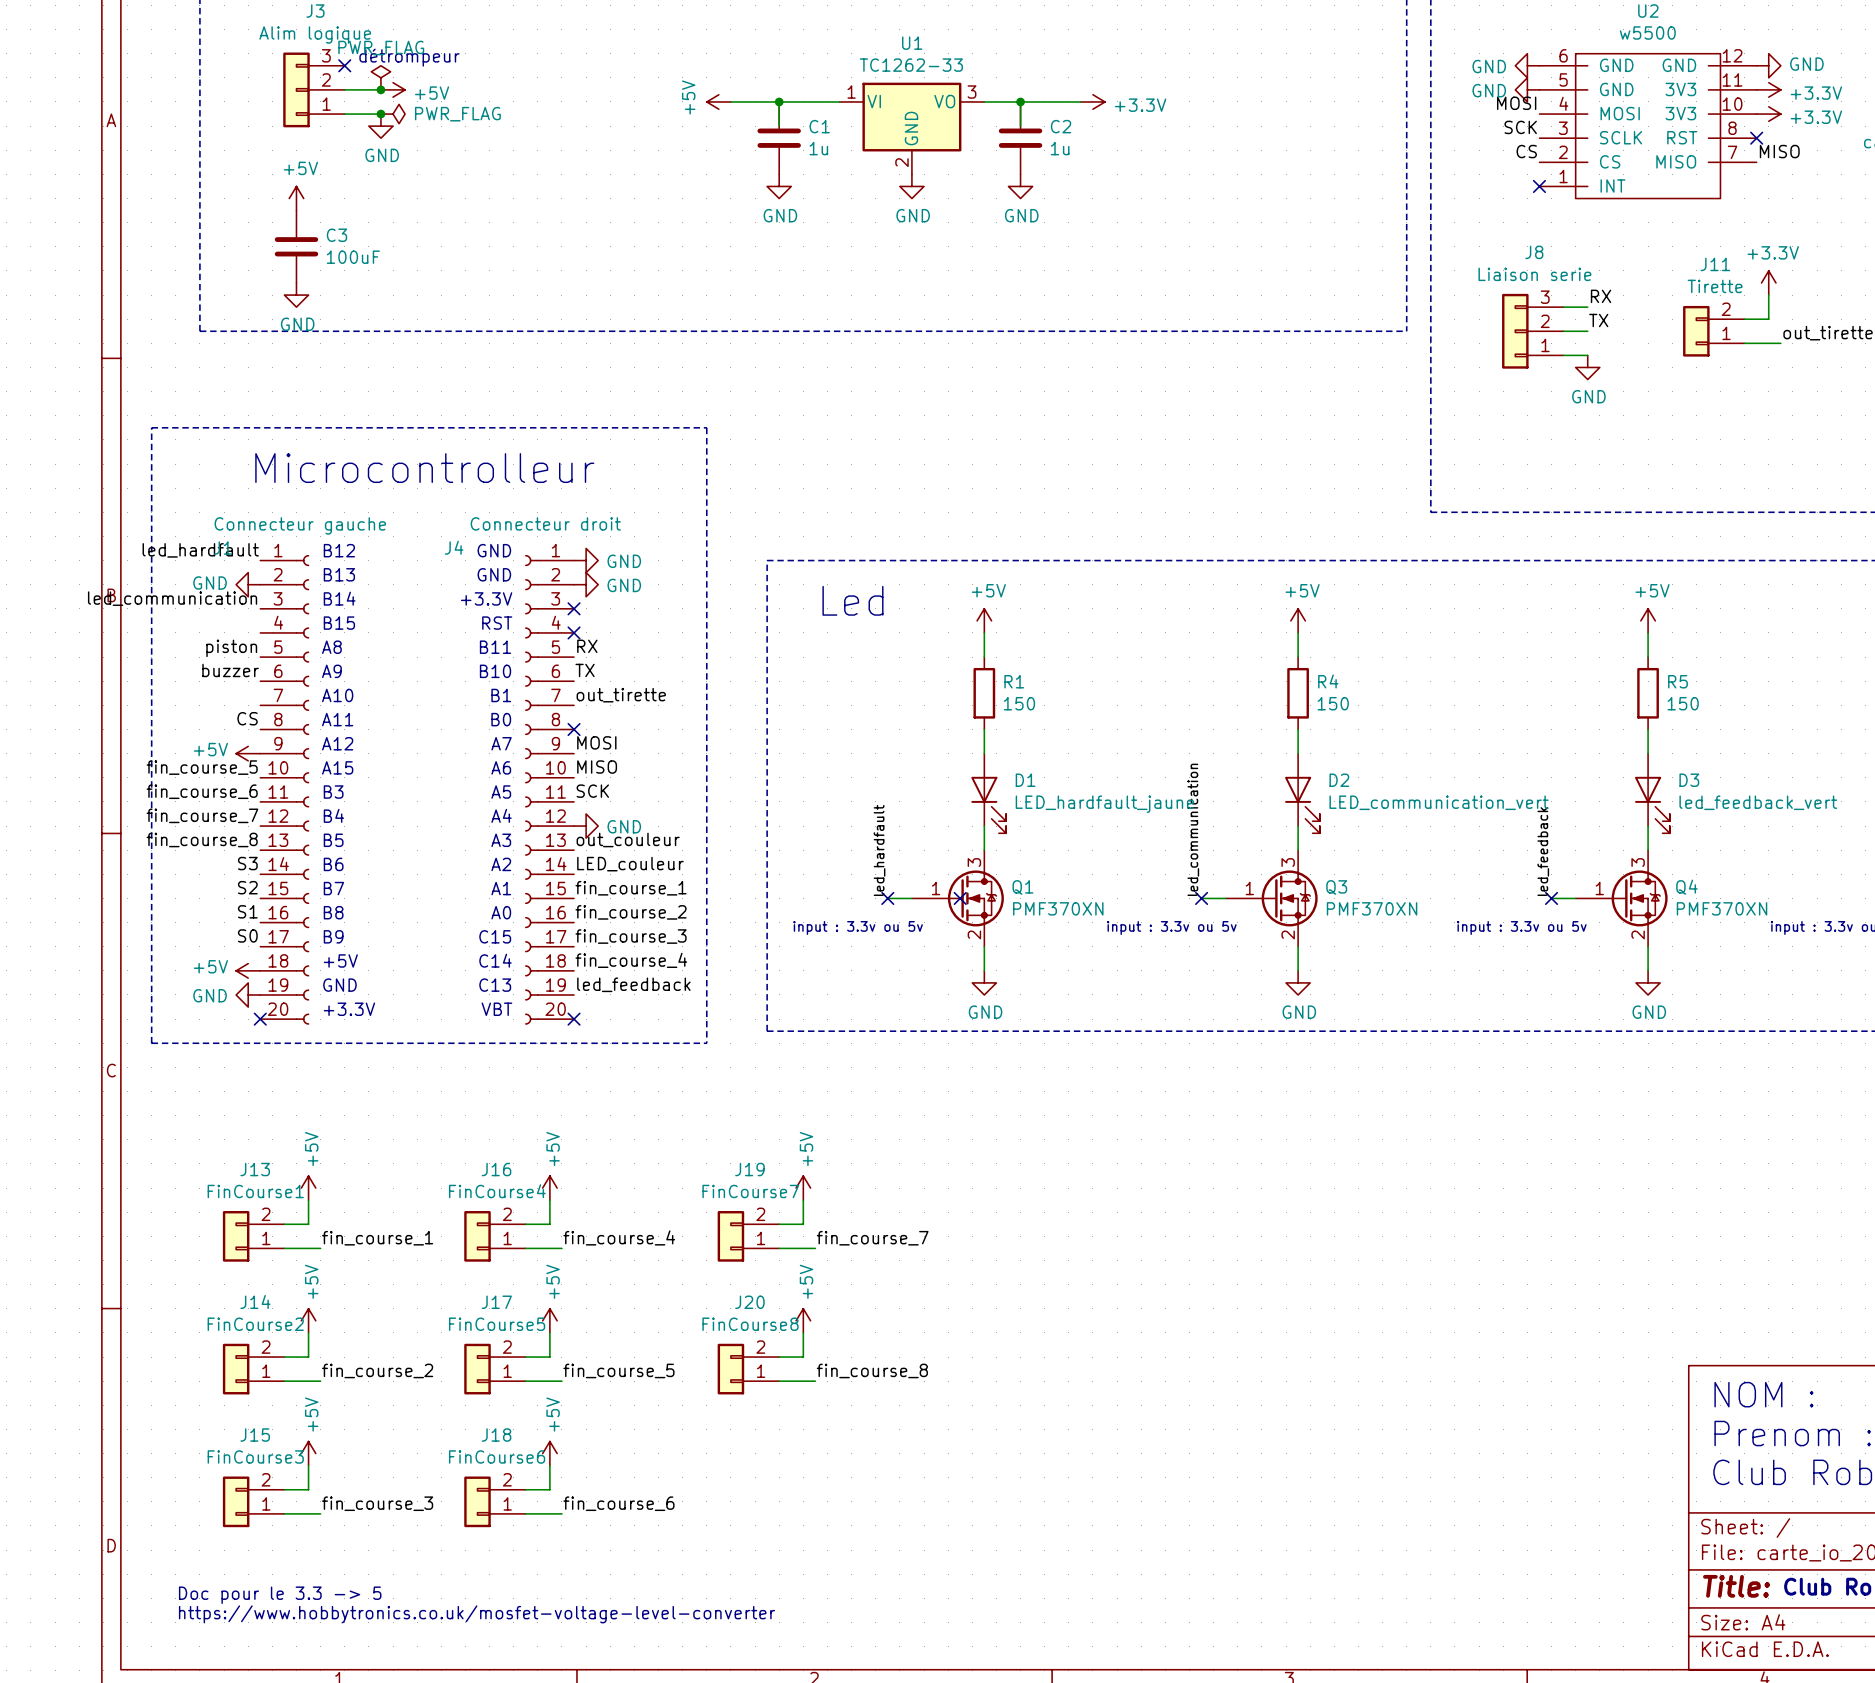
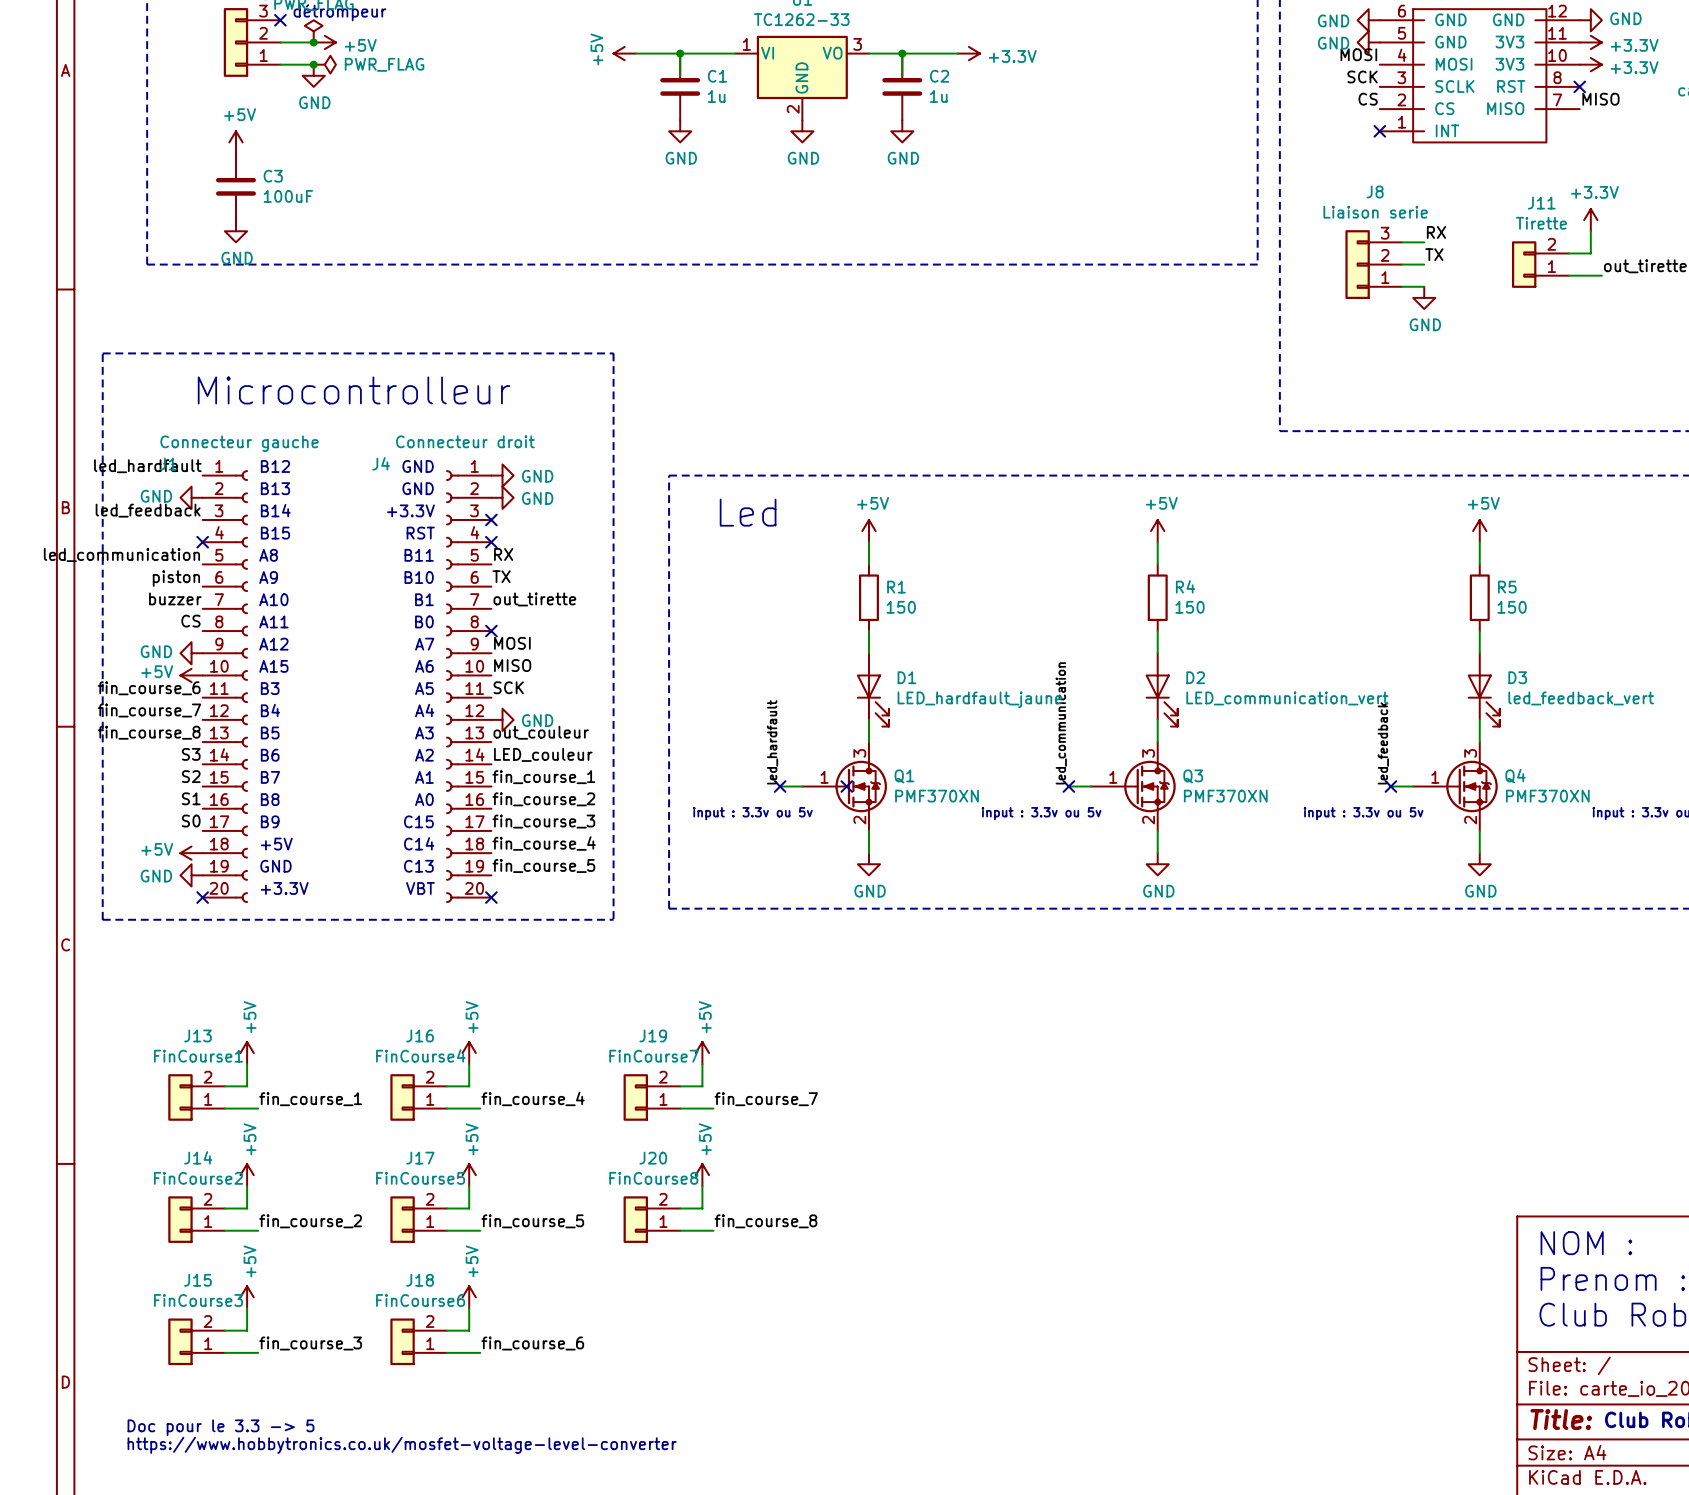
label: led_communication (172, 598) -> led_feedback (148, 510)
no-connect mark: none -> (202, 542)
label: piston (231, 648) -> led_communication (121, 555)
label: buzzer (230, 670) -> piston (176, 578)
label: none -> buzzer (175, 598)
power symbol: +5V (248, 753) -> GND (191, 653)
label: fin_course_5 (202, 767) -> none
power symbol: none -> +5V (191, 675)
label: led_feedback (633, 984) -> fin_course_5 (543, 865)

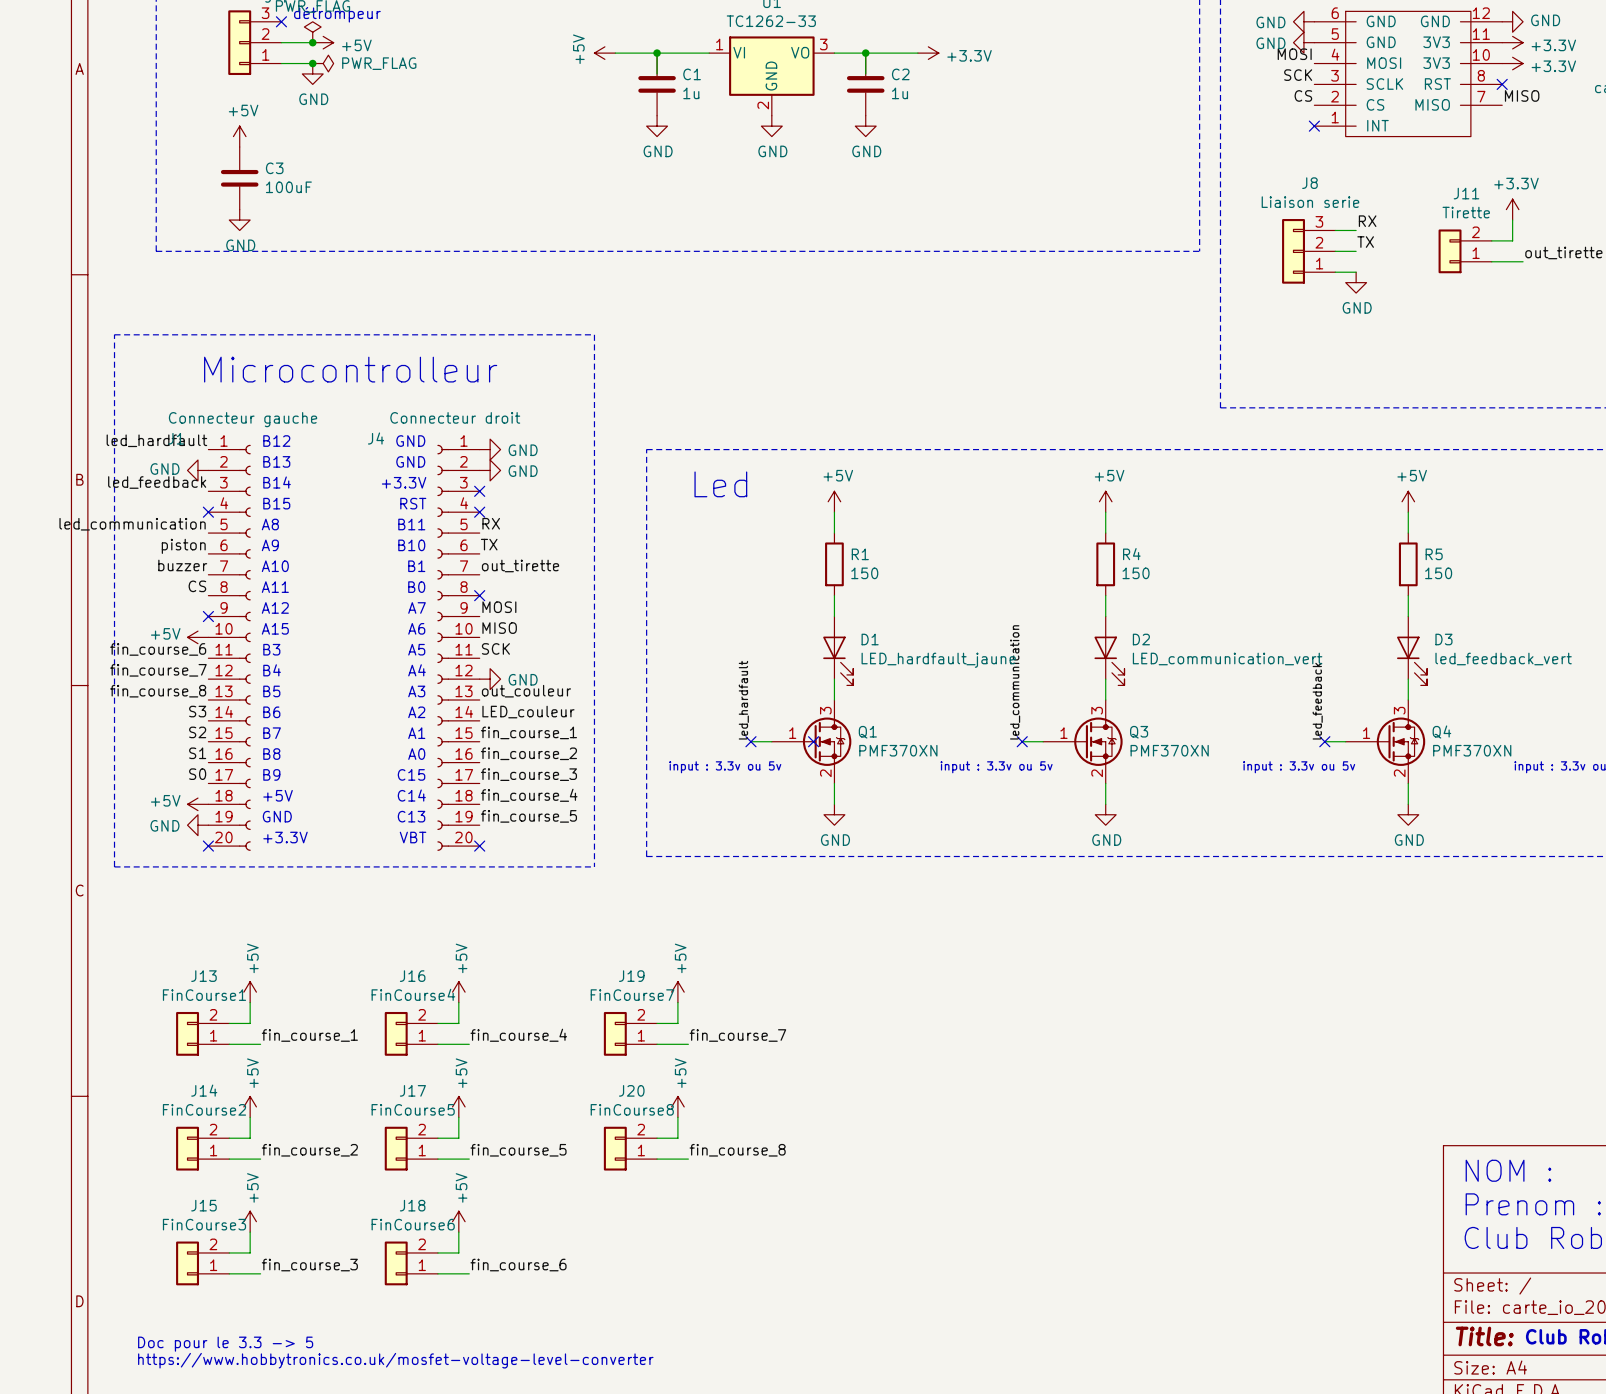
power symbol: GND (191, 653) -> none
no-connect mark: none -> (208, 616)

